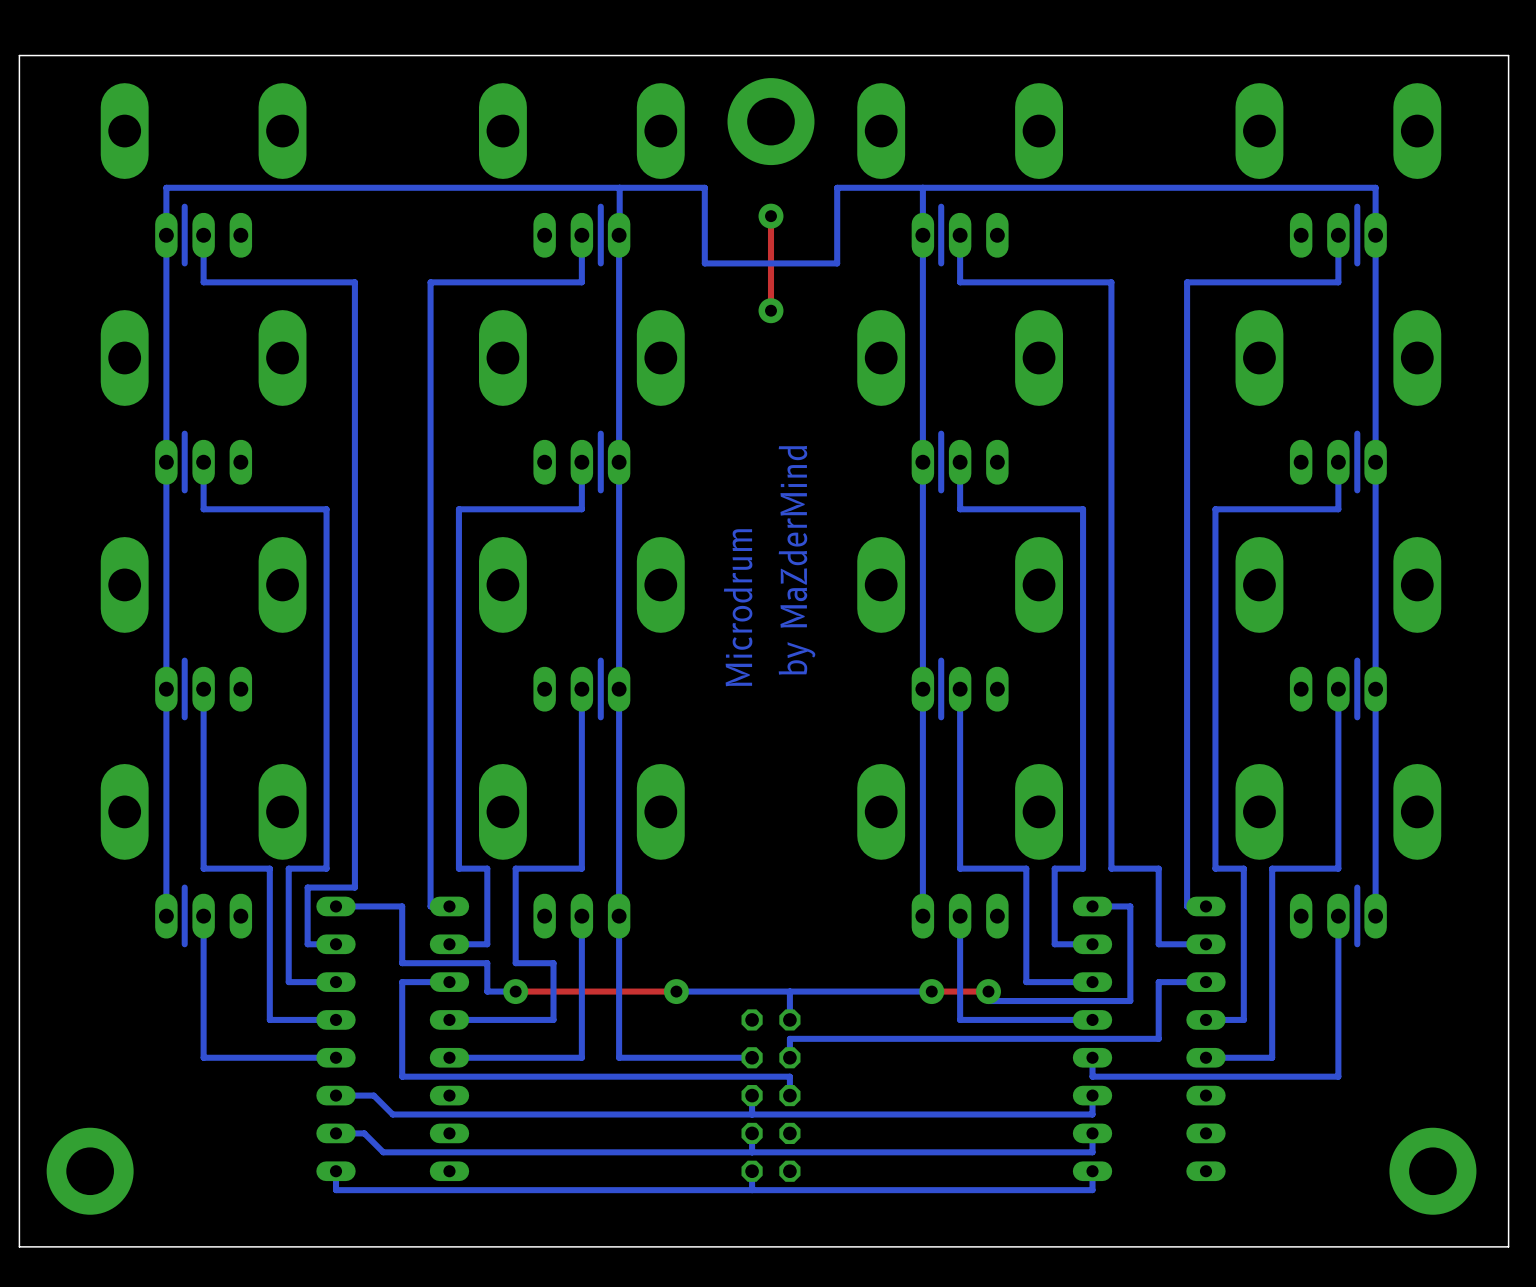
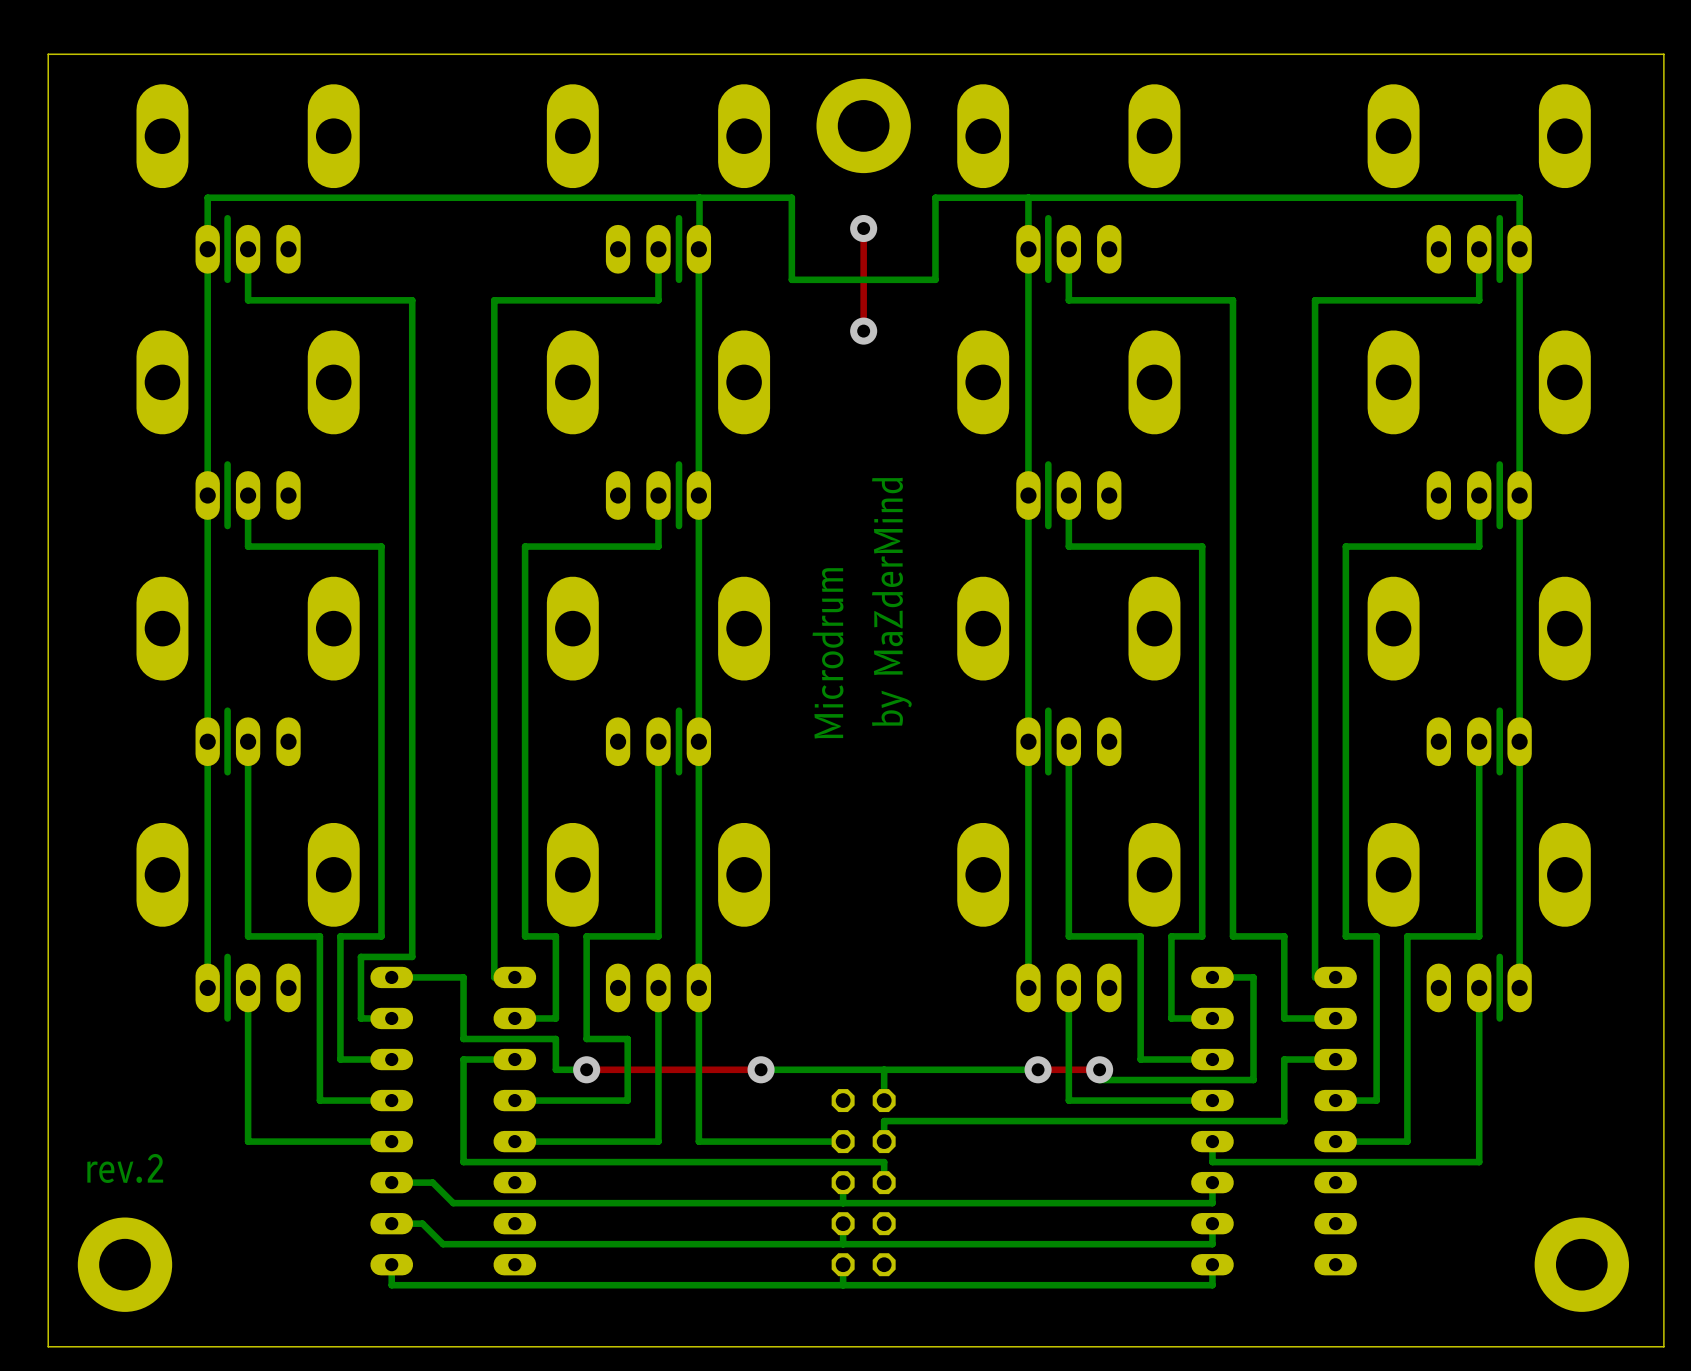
text: none -> rev.2 (125, 1168)

